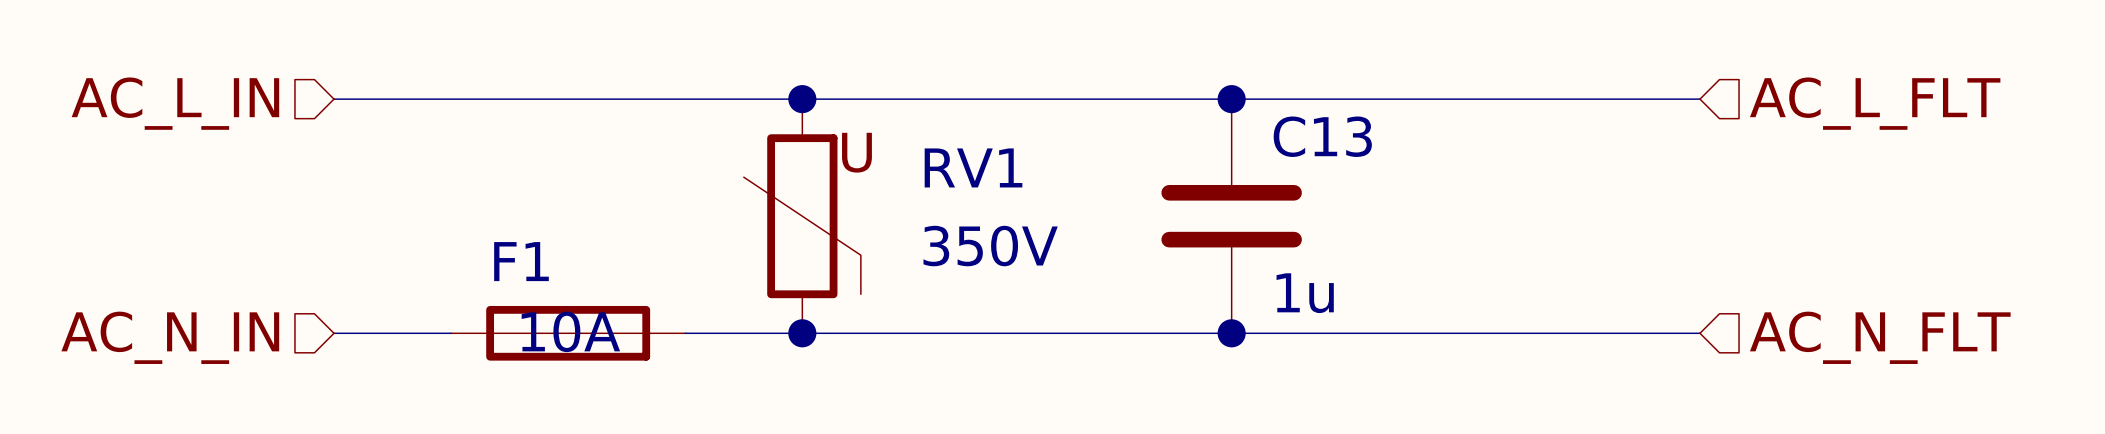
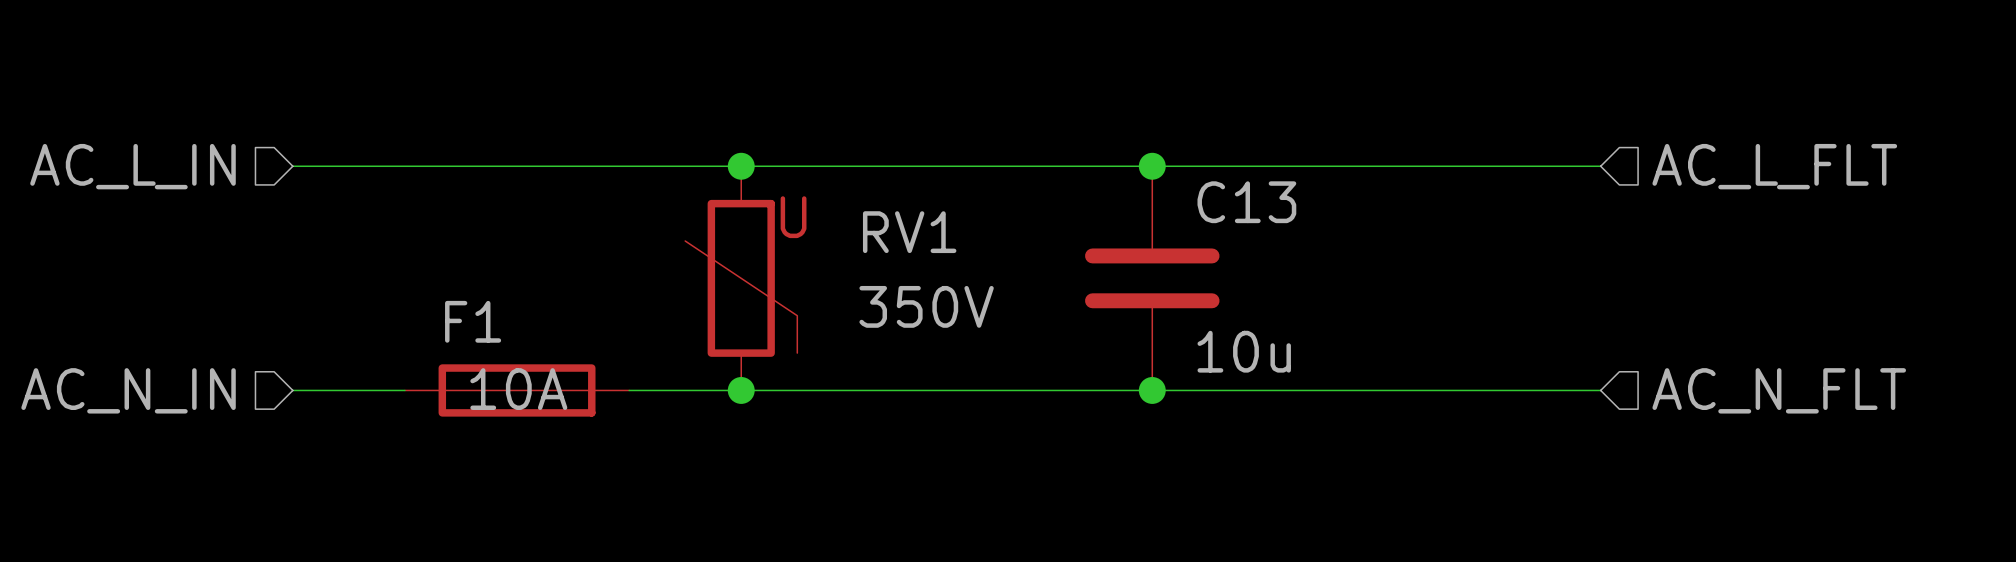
C13 value: 1u (1305, 293) -> 10u (1244, 351)

